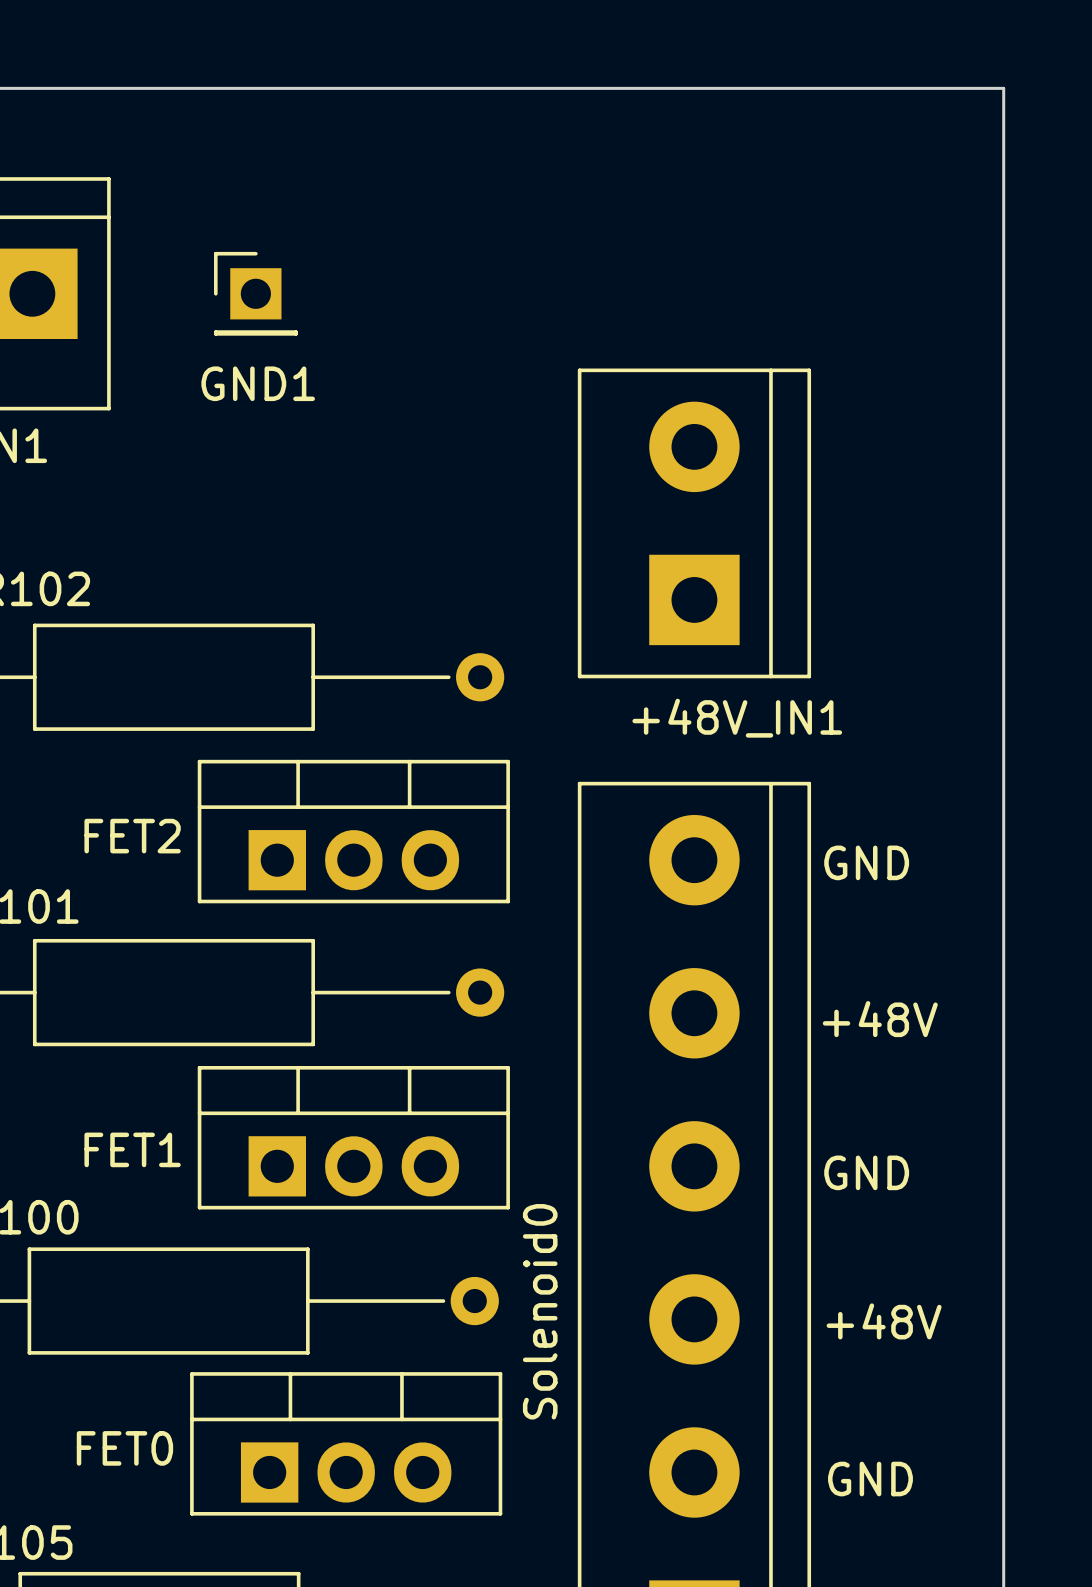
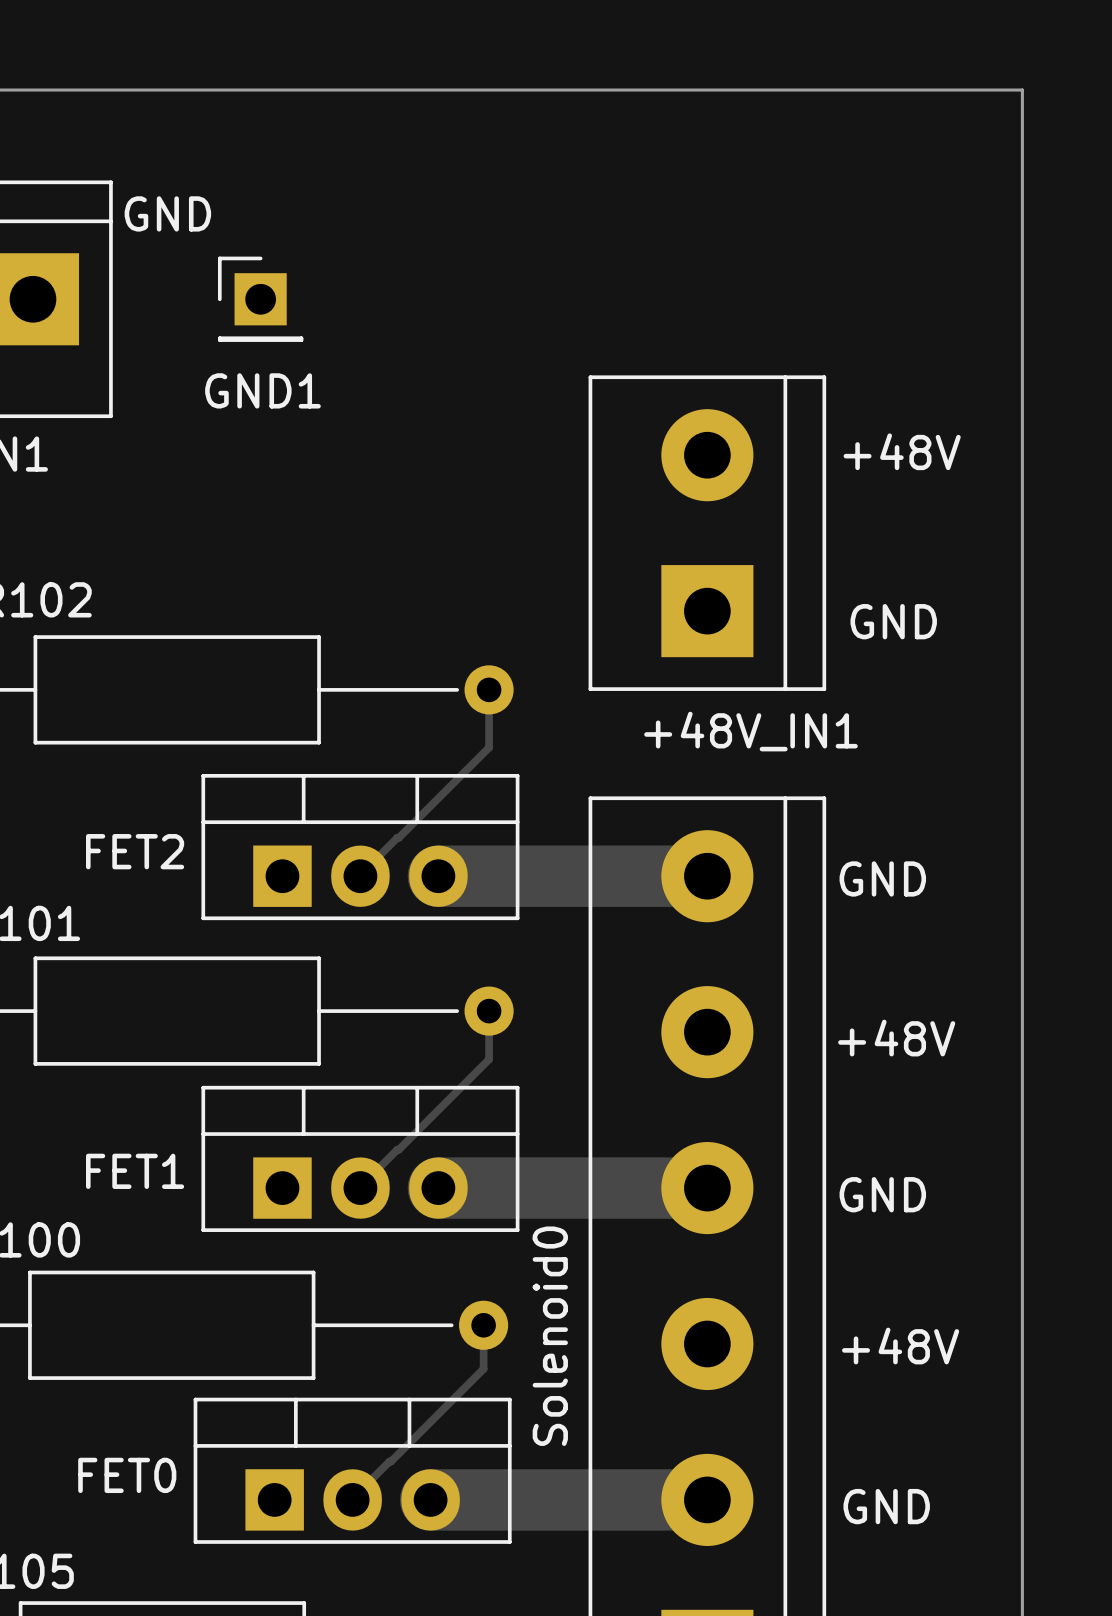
text: none -> GND (167, 213)
text: none -> +48V (902, 451)
text: none -> GND (893, 621)
track: none -> (489, 689) (489, 747) (360, 876)
track: none -> (438, 876) (707, 876)
track: none -> (489, 1011) (489, 1059) (360, 1188)
track: none -> (438, 1188) (707, 1188)
track: none -> (483, 1325) (483, 1368) (352, 1499)
track: none -> (430, 1499) (707, 1499)

